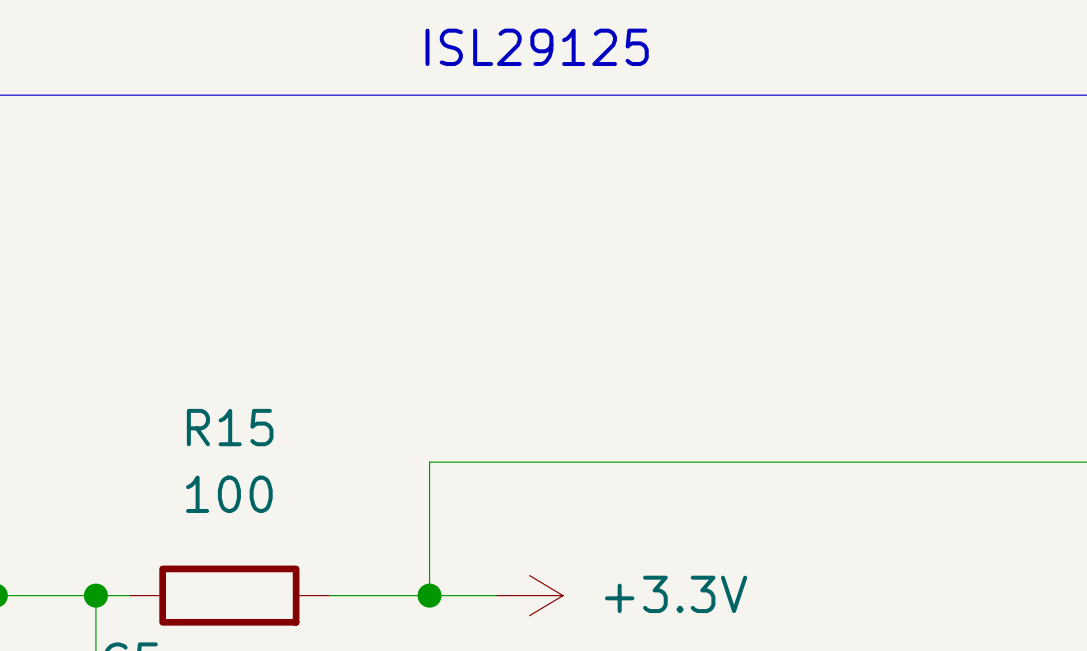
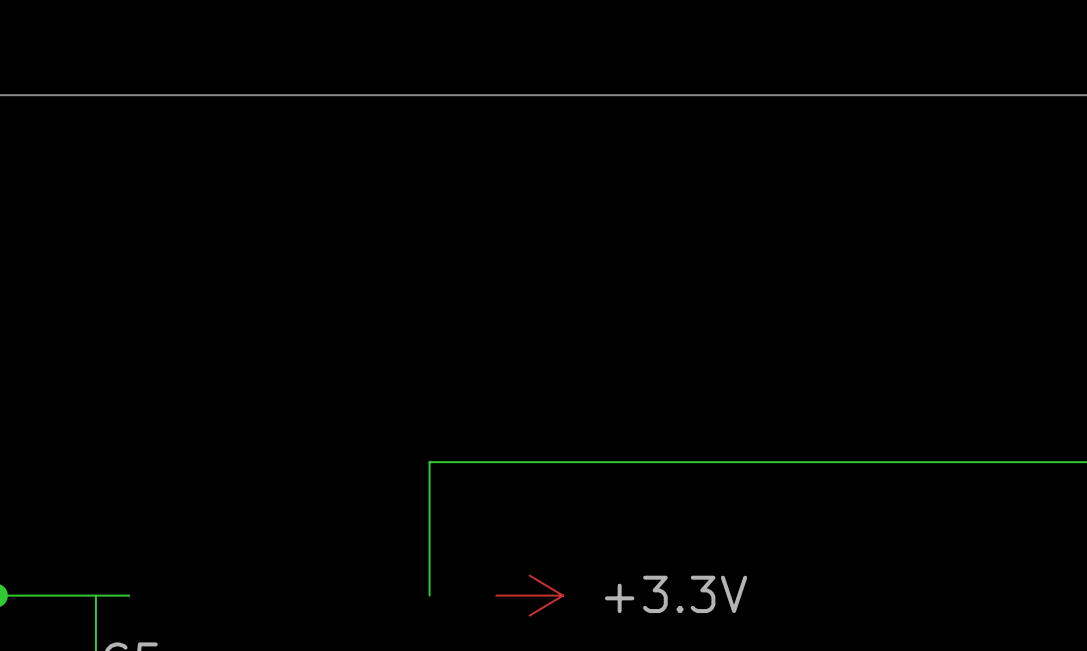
text: ISL29125 (537, 47) -> none
junction: (95, 595) -> none
R15: 100 (229, 595) -> none
wire: (329, 595) (496, 595) -> none
junction: (429, 595) -> none

